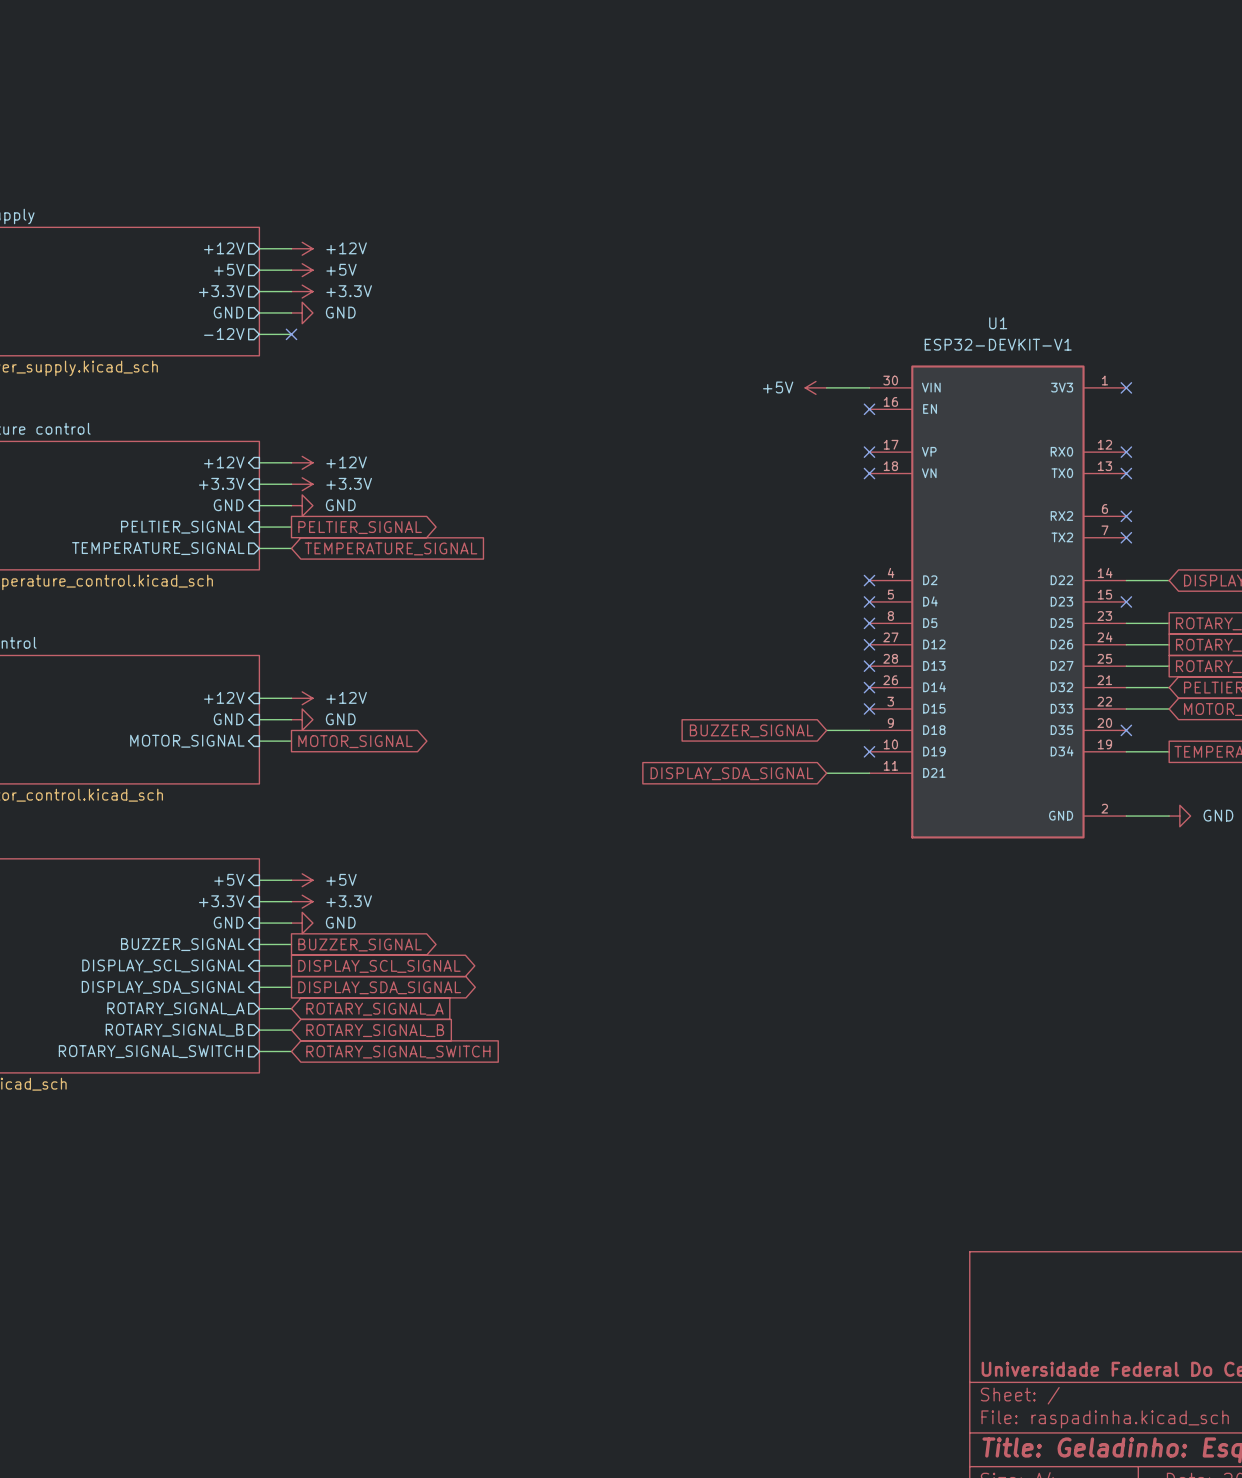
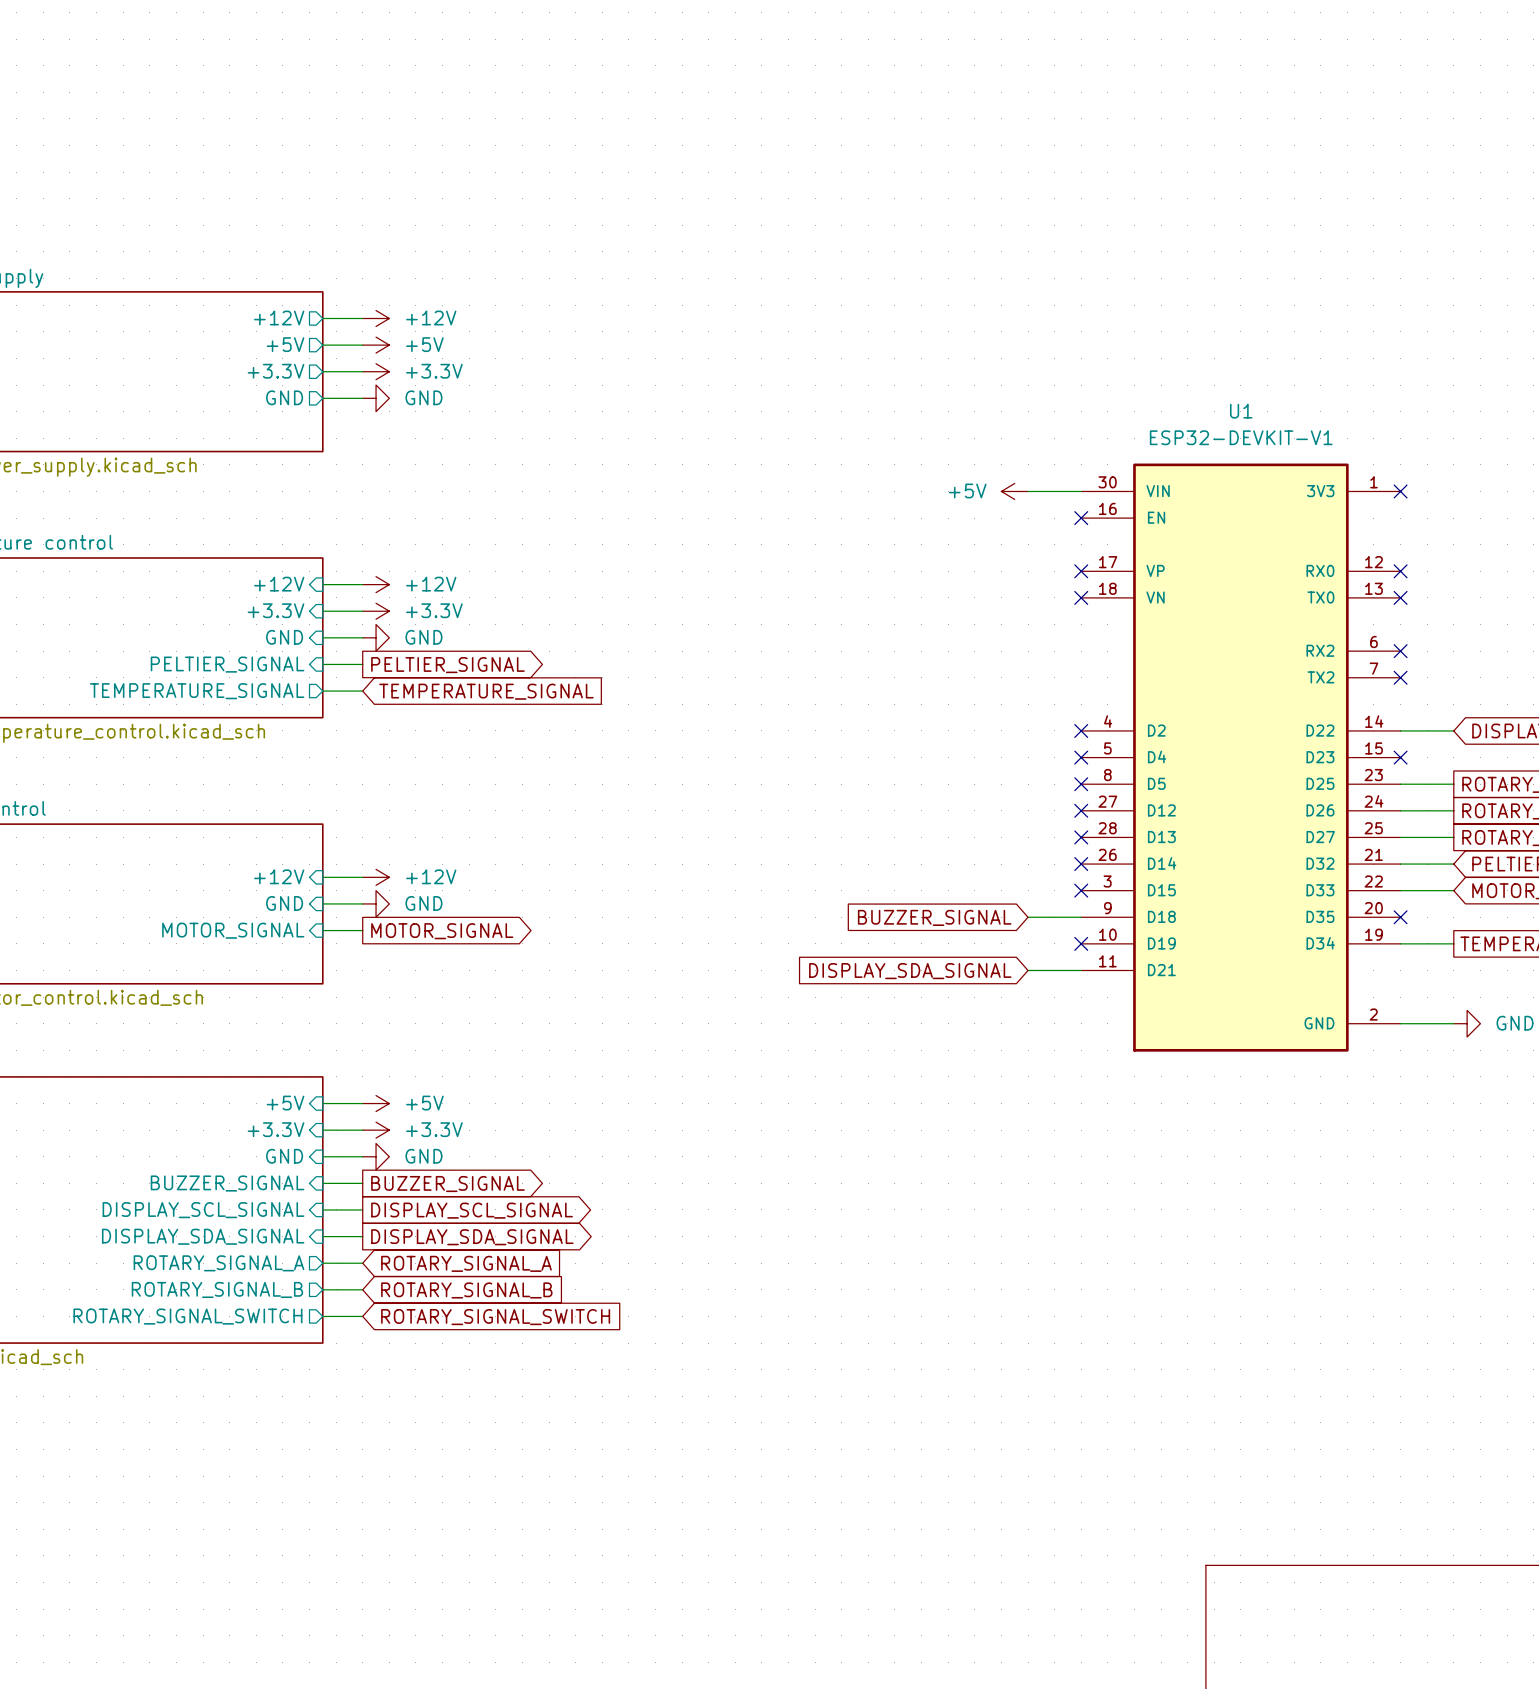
sheet pin: -12V (224, 333) -> none
wire: (259, 334) (291, 334) -> none
no-connect mark: (291, 334) -> none

